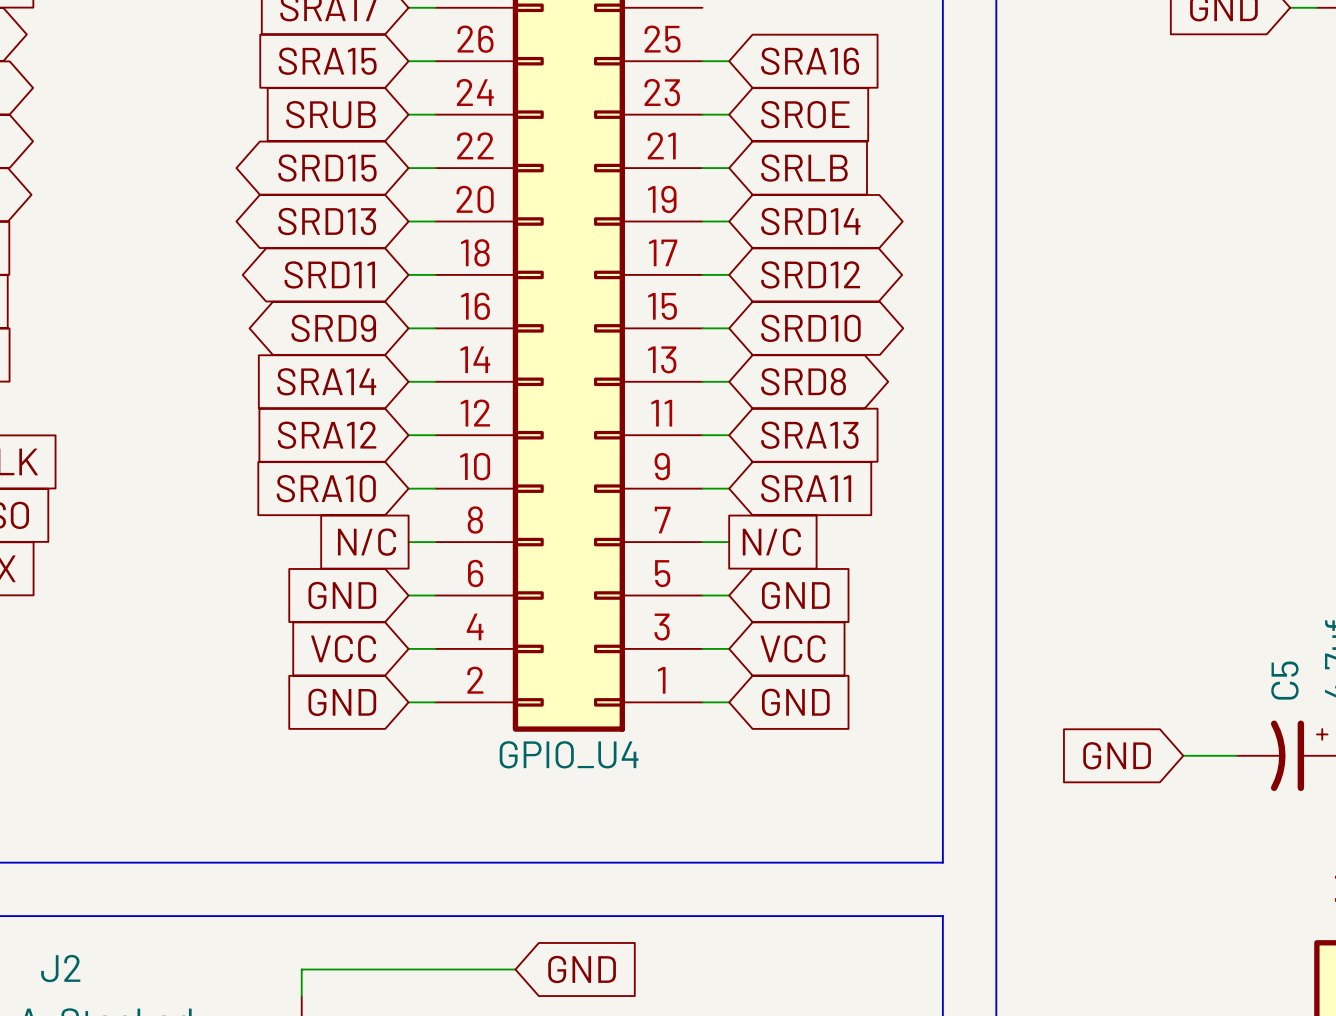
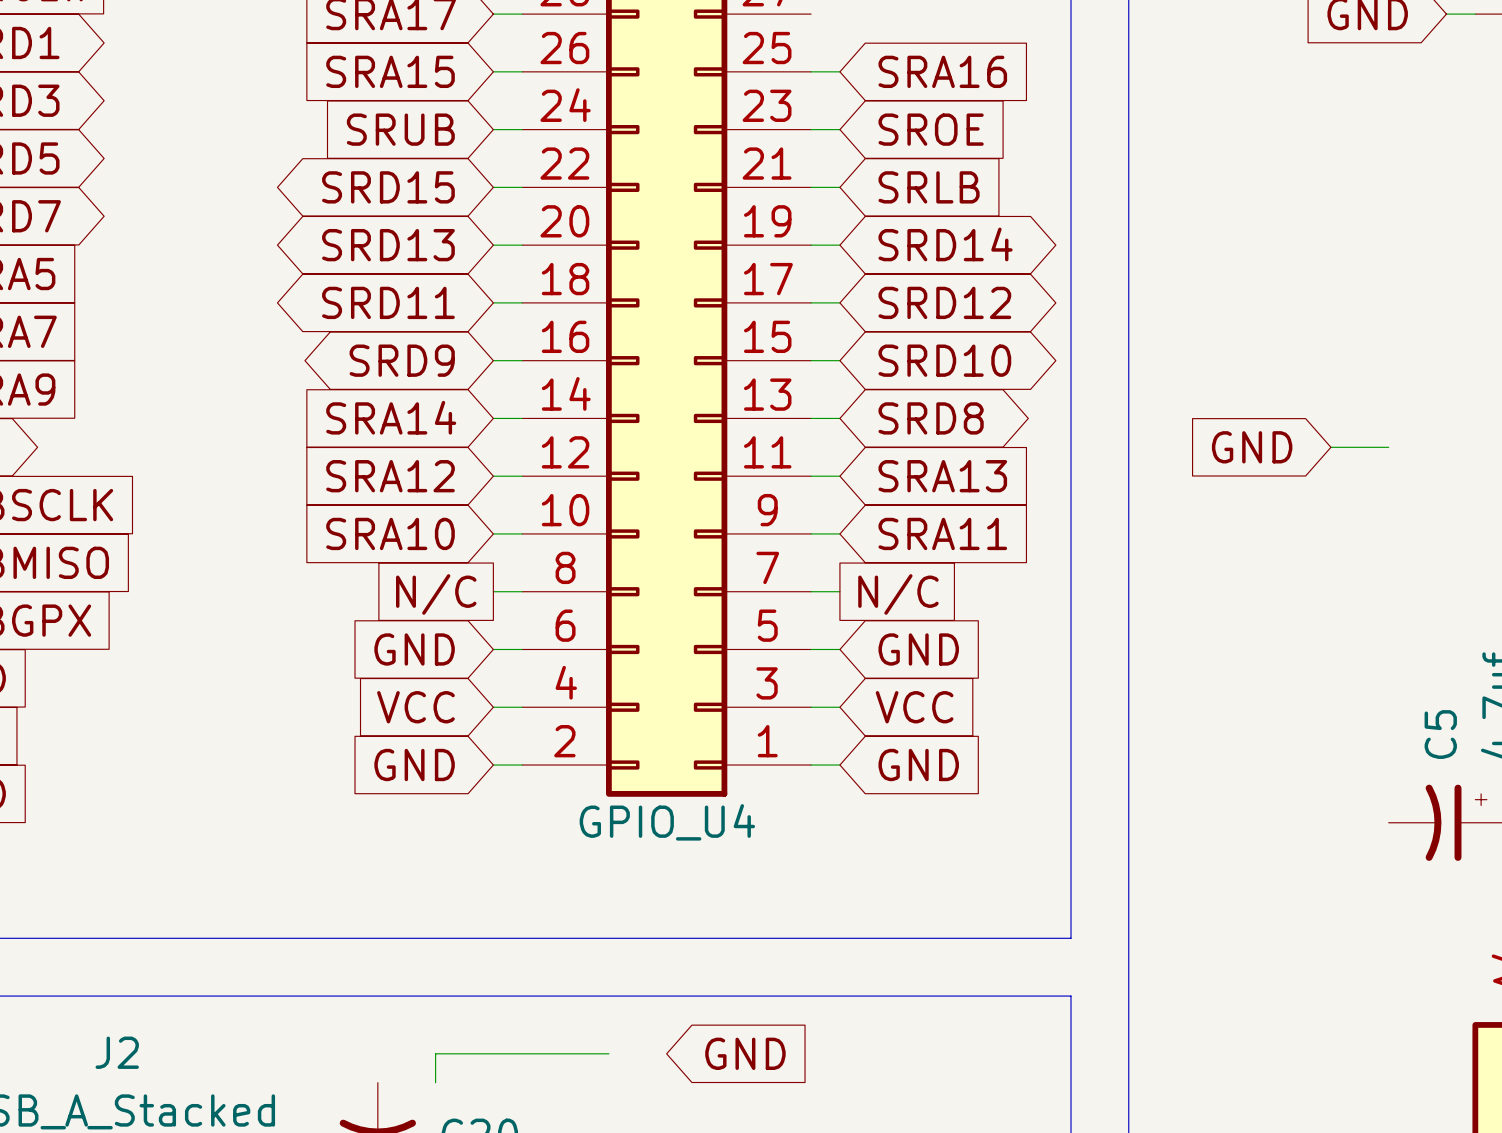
global label: none -> GND (1252, 447)
global label: GND (1117, 755) -> none
wire: (1183, 755) (1236, 755) -> (1330, 447) (1388, 447)
wire: (355, 969) (301, 969) (301, 996) -> (435, 1053) (435, 1082)
global label position: GND (582, 969) -> GND (745, 1053)

